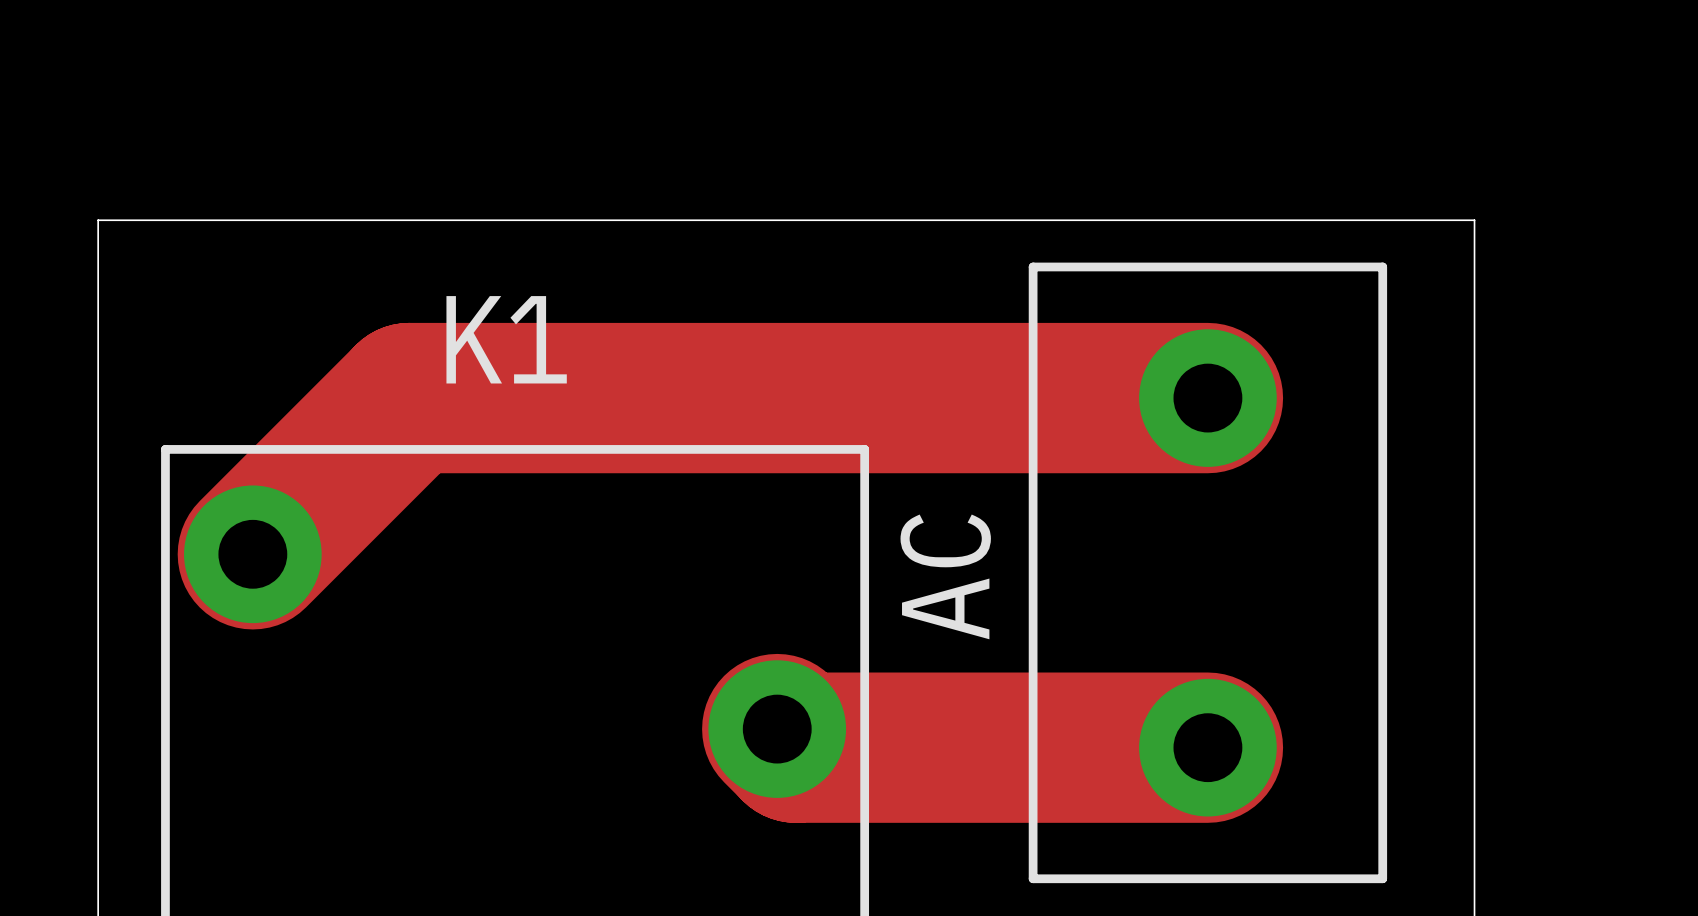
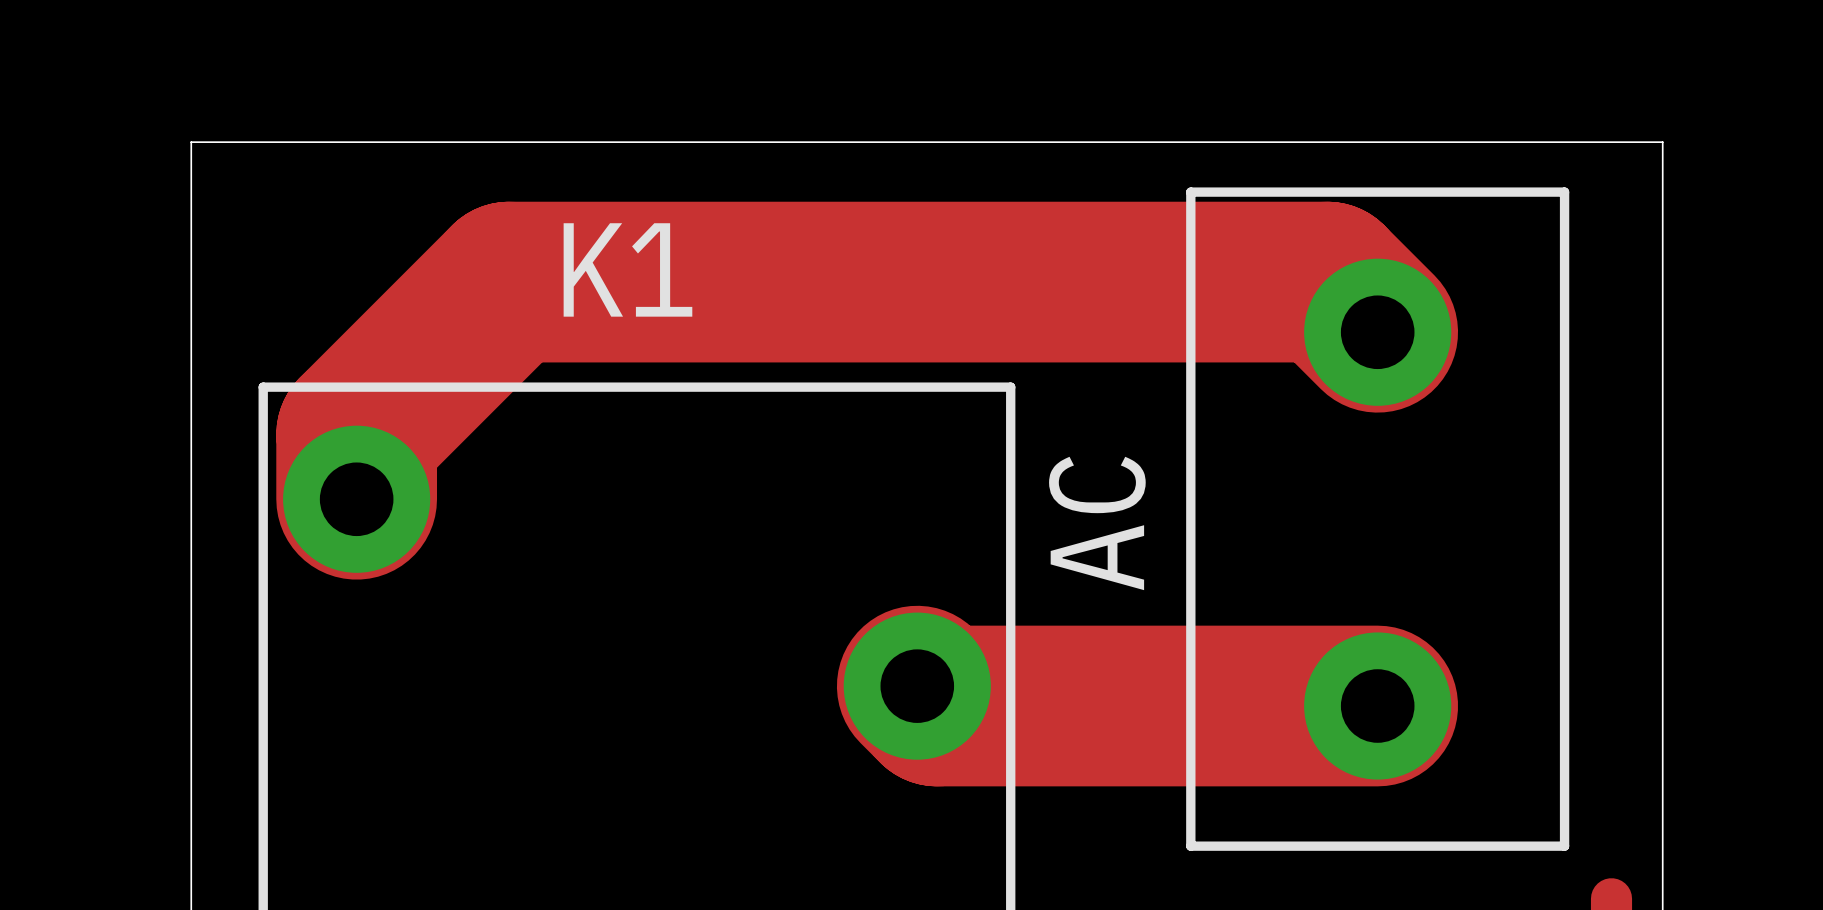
track: (1207, 398) (409, 398) (252, 554) -> (1377, 332) (1327, 282) (508, 282) (356, 434) (356, 499)

